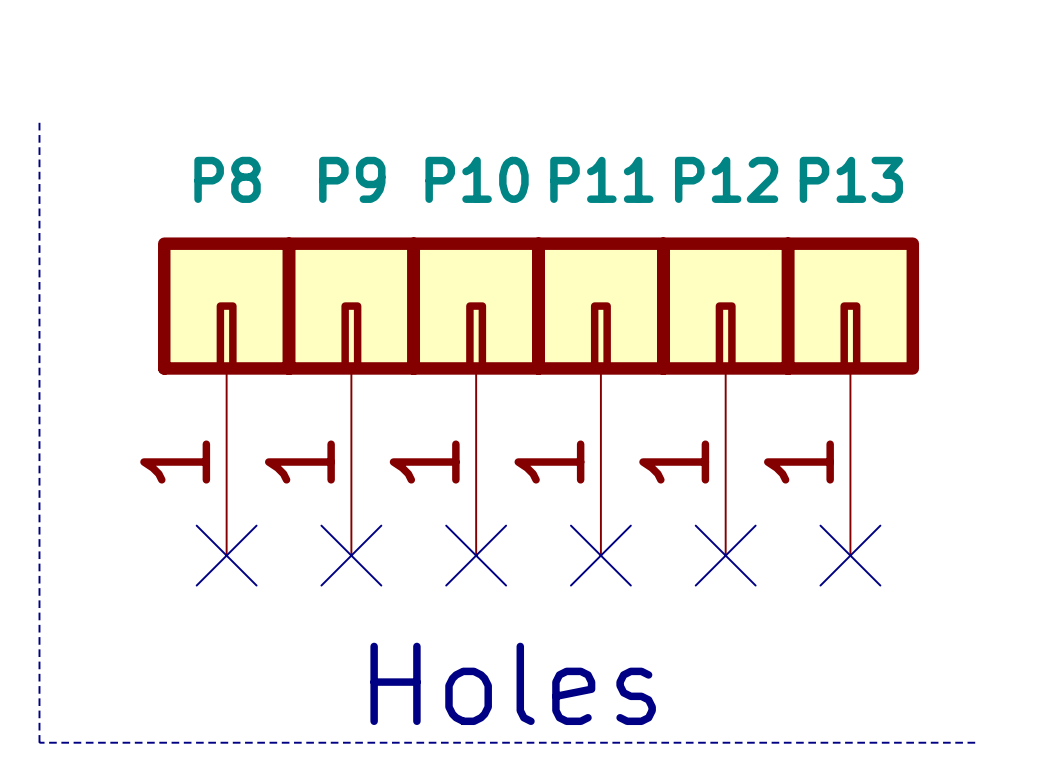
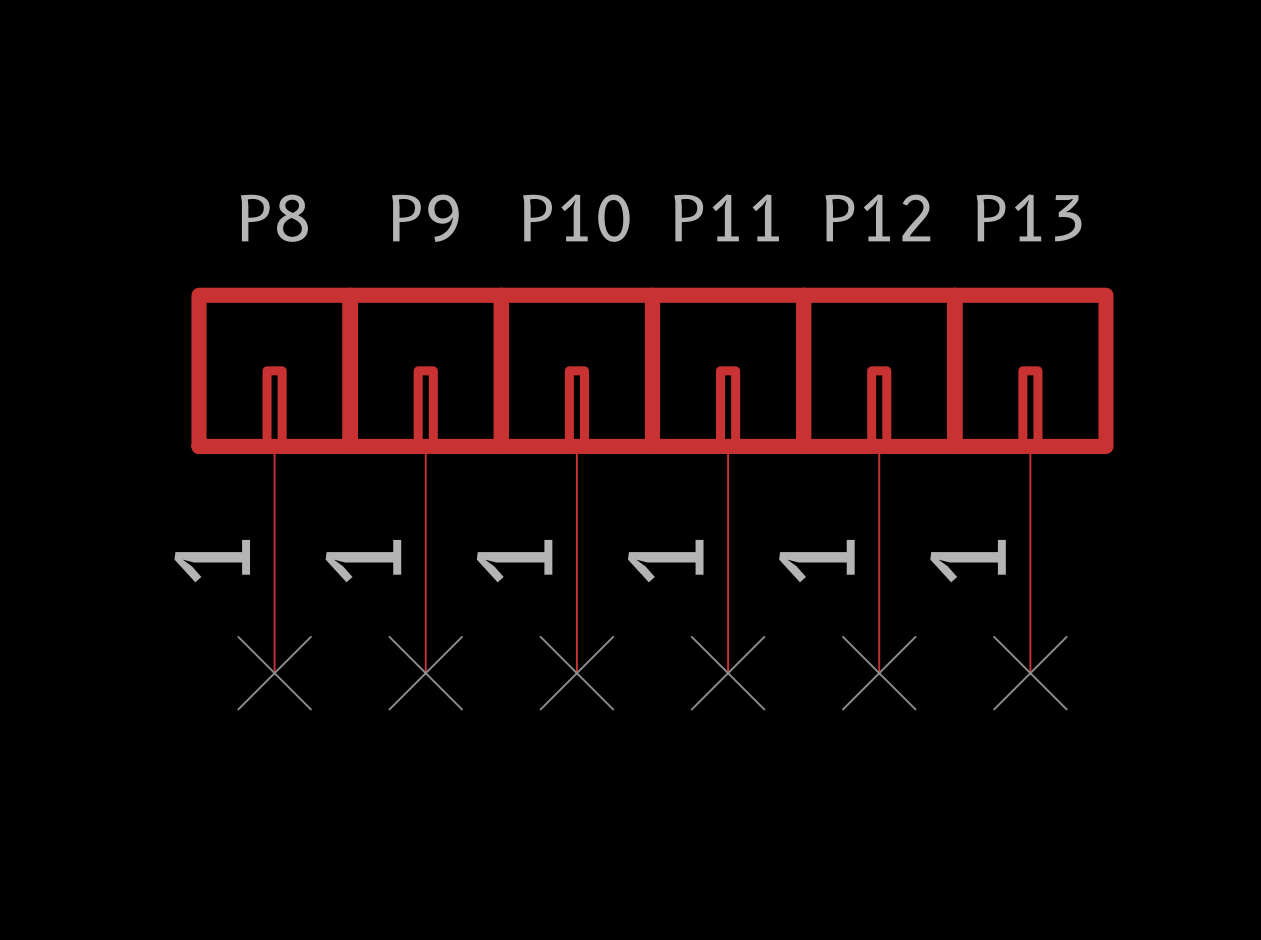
line: (39, 118) (39, 742) (975, 742) -> none
text: Holes (513, 683) -> none

